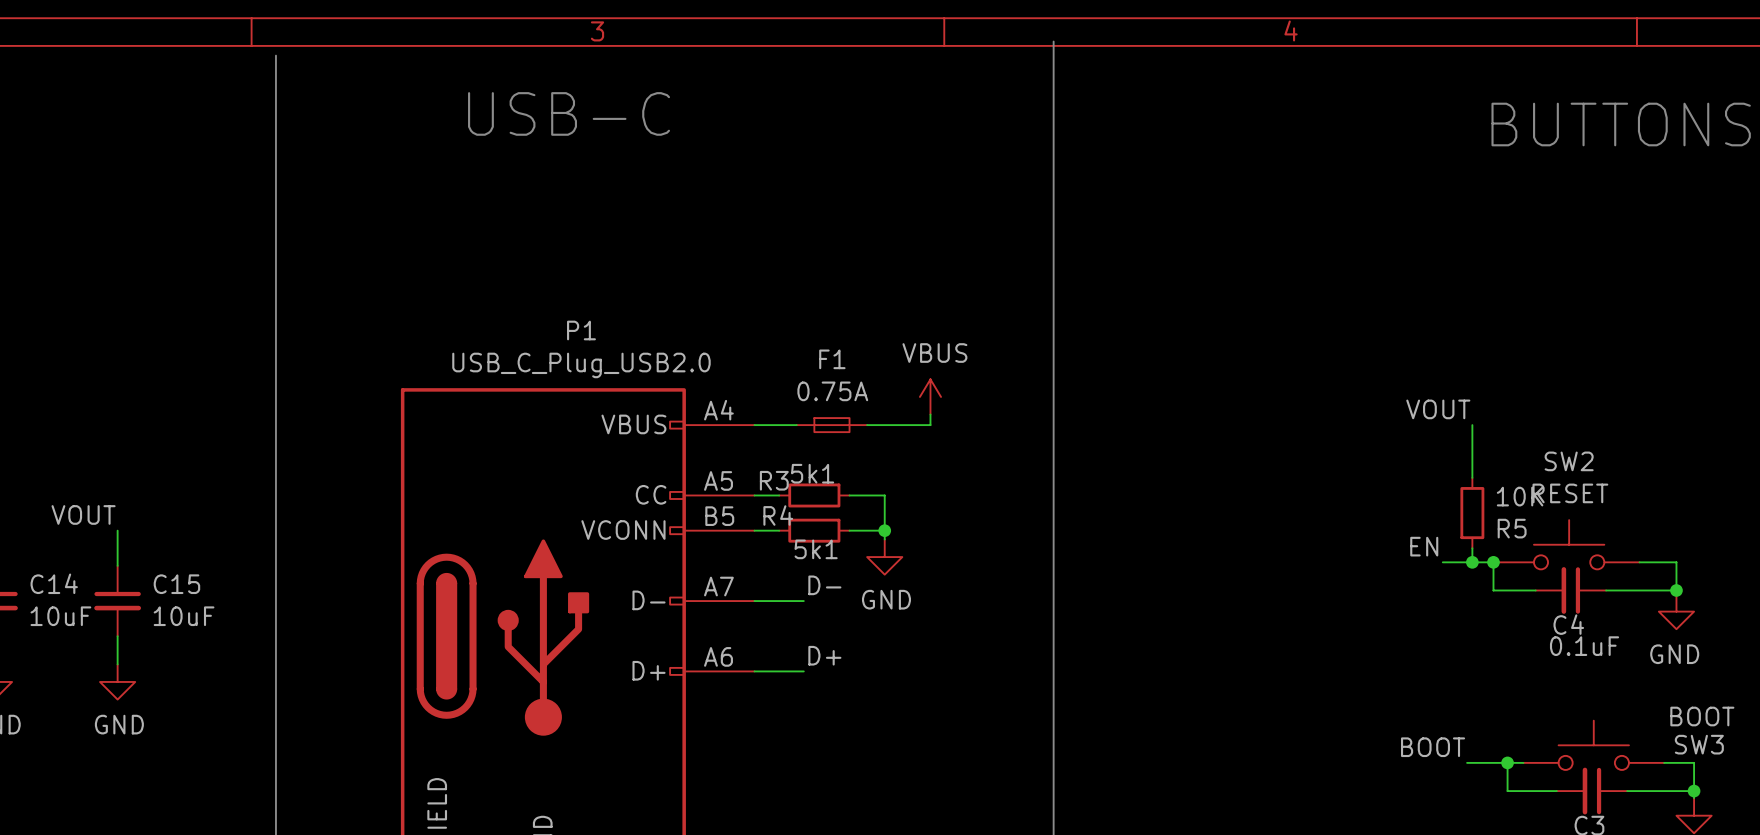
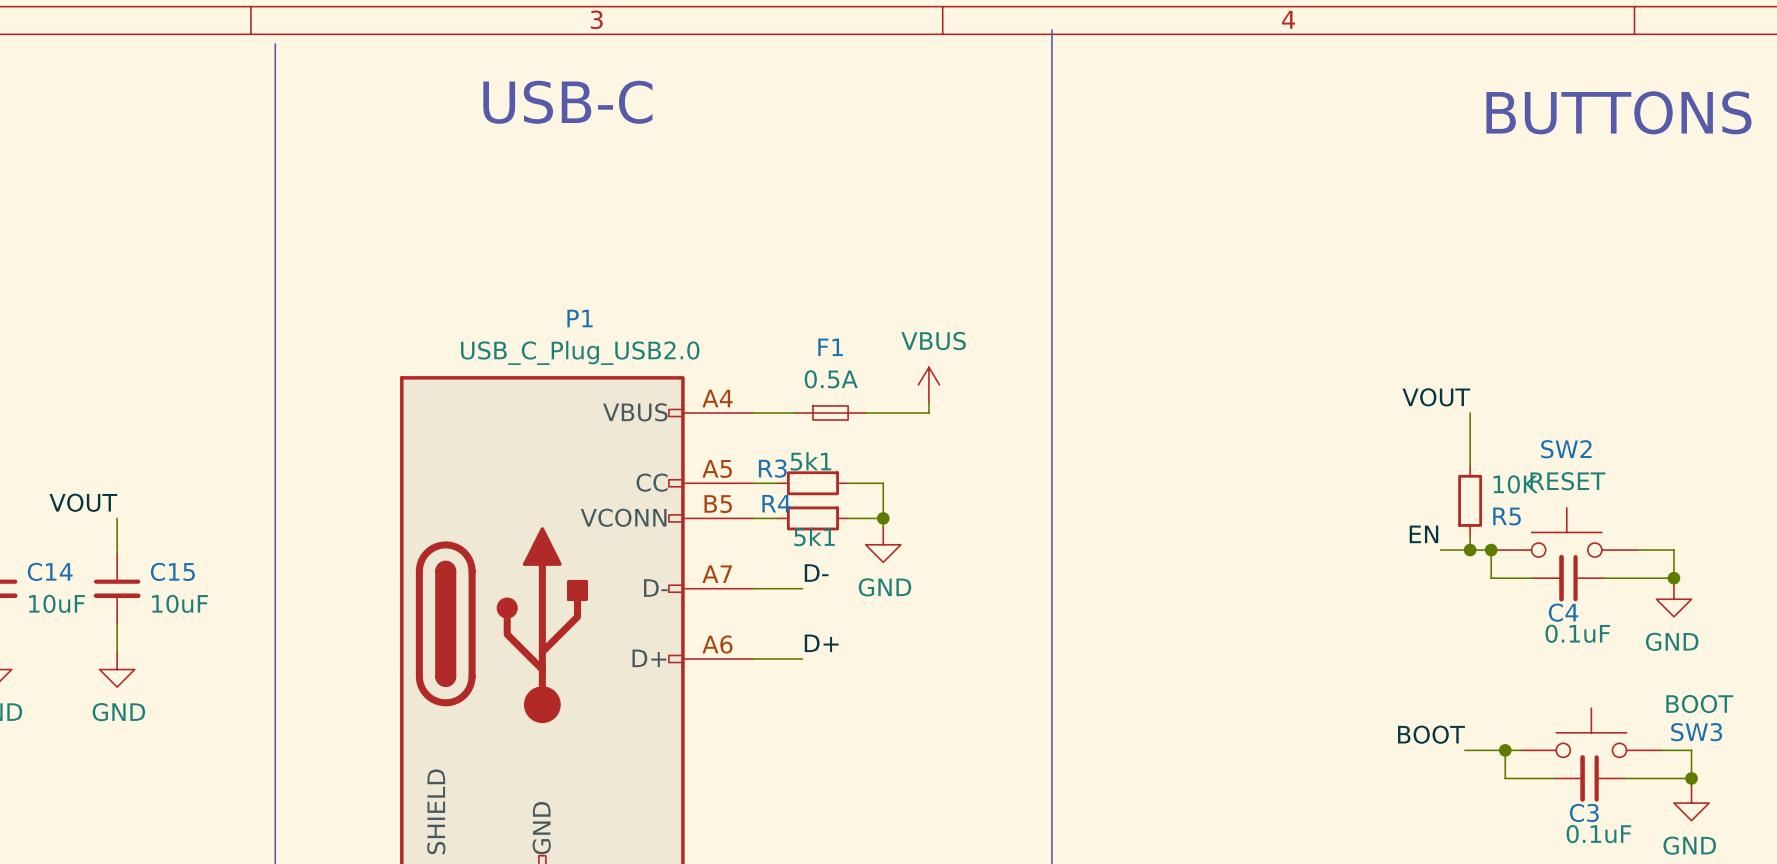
F1 value: 0.75A (832, 391) -> 0.5A (831, 379)

